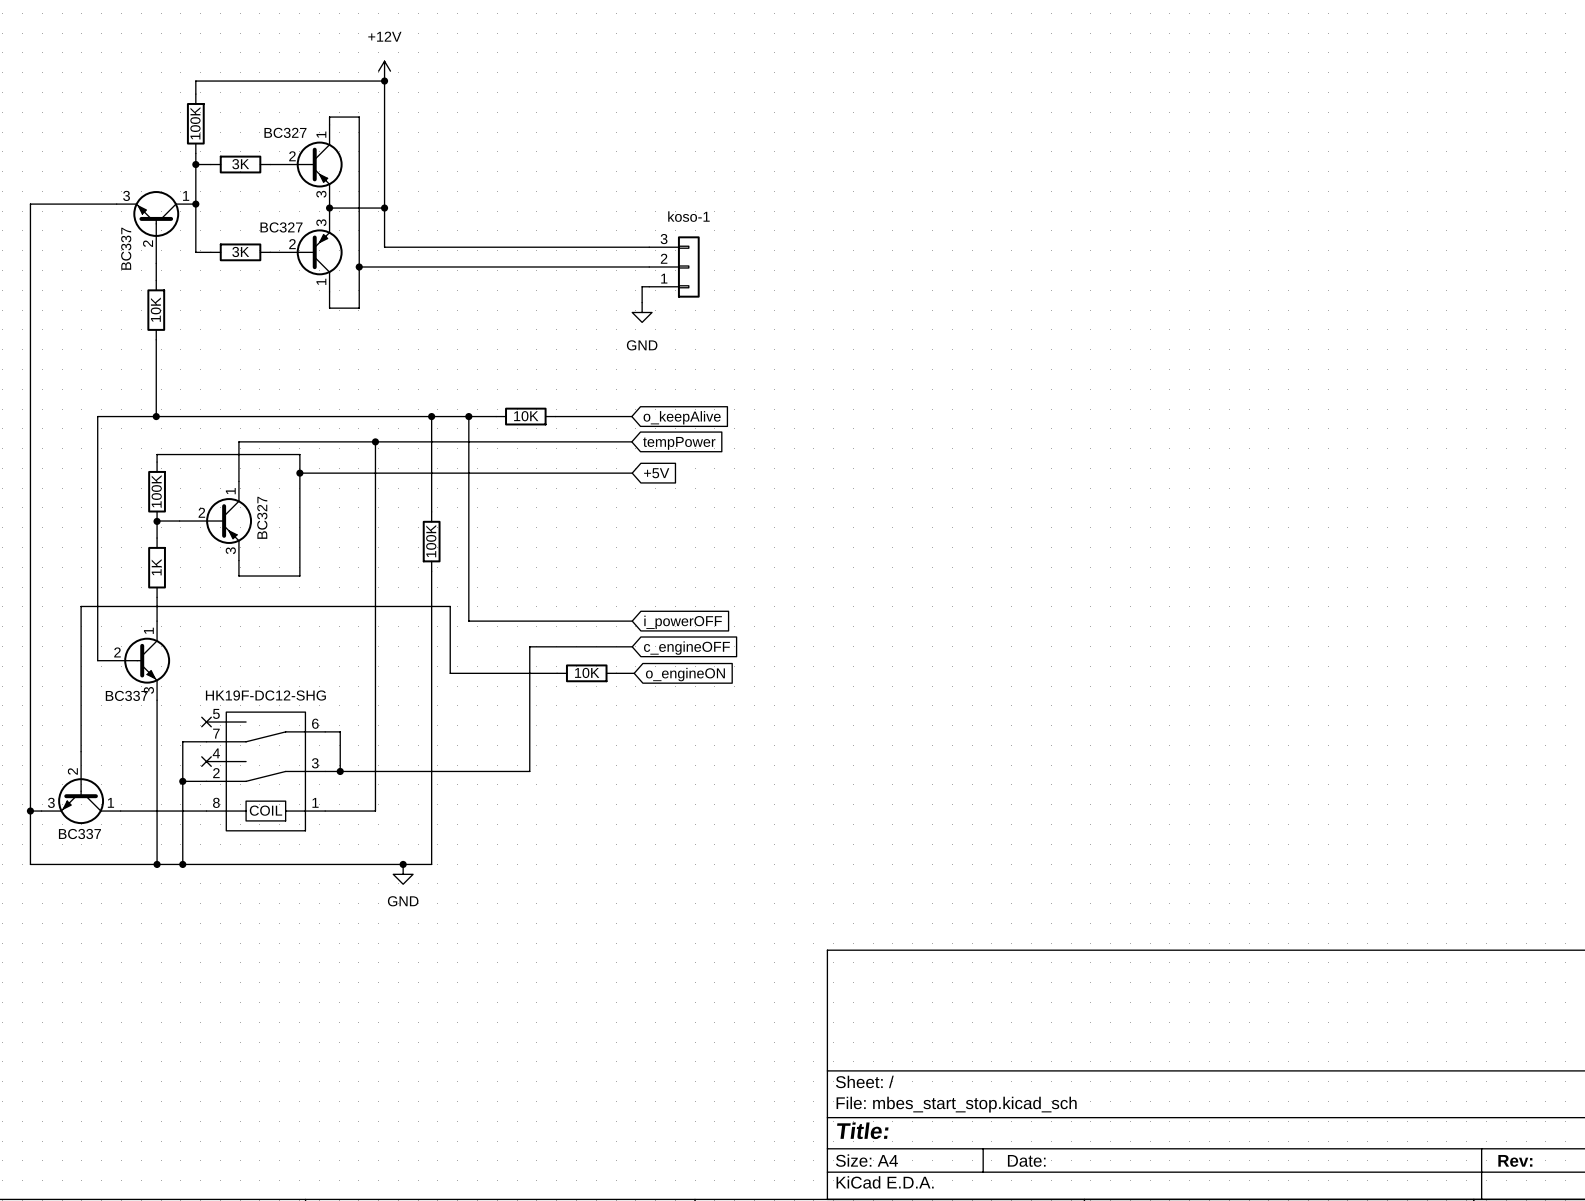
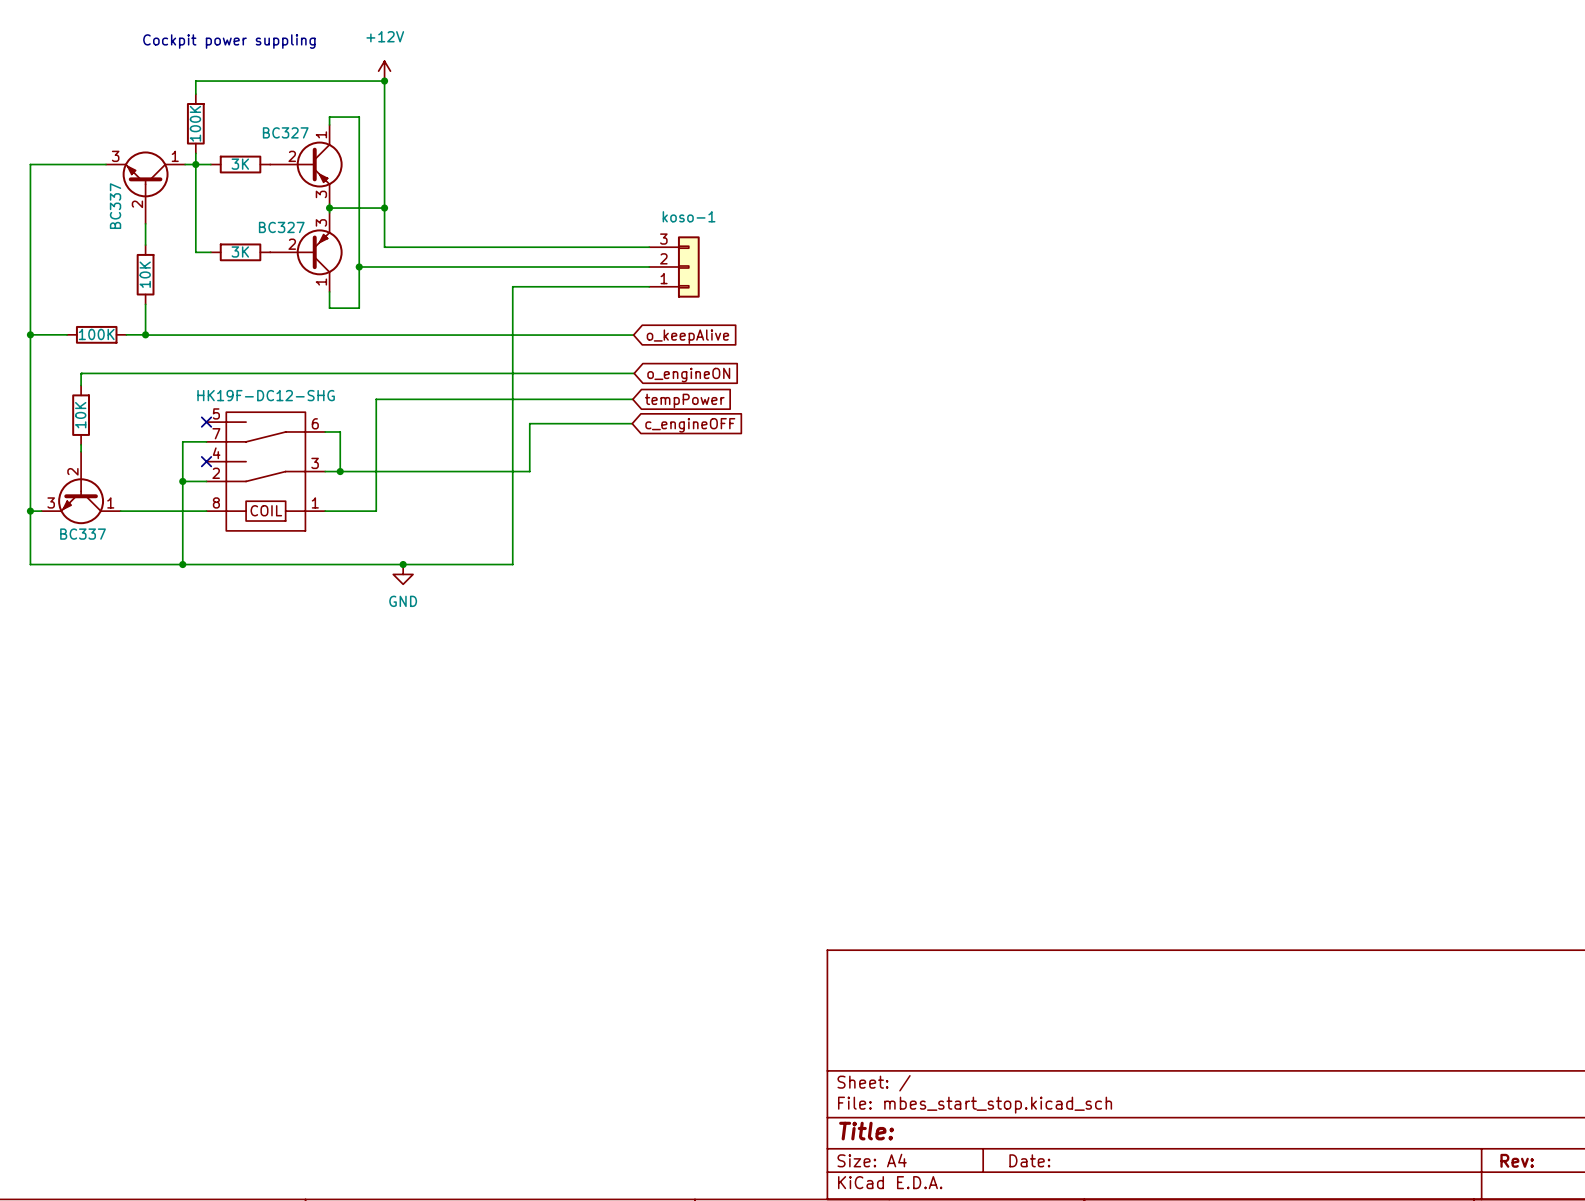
text: none -> Cockpit power suppling (229, 41)
wire: none -> (185, 164) (195, 164)
wire: (30, 204) (116, 204) -> (30, 204) (30, 164) (106, 164)
junction: (195, 204) -> none
wire: none -> (145, 223) (145, 245)
part position: (156, 227) -> (145, 187)
wire: (156, 263) (156, 280) -> none
wire: (642, 286) (642, 302) -> none
wire: none -> (145, 304) (145, 335) (633, 335)
part position: (156, 310) -> (145, 274)
power symbol: GND (642, 312) -> none
wire: none -> (30, 334) (67, 334)
junction: none -> (30, 334)
wire: none -> (126, 334) (145, 334)
junction: none -> (145, 334)
wire: (156, 339) (156, 416) -> none
wire: none -> (634, 373) (81, 373) (81, 385)
global label: none -> o_engineON (688, 375)
wire: none -> (632, 399) (376, 399) (376, 511) (325, 511)
part: none -> 10K (81, 415)
junction: (156, 416) -> none
wire: (431, 416) (431, 511) -> none
junction: (431, 416) -> none
wire: (468, 416) (468, 621) (632, 621) -> none
junction: (468, 416) -> none
wire: (496, 416) (97, 416) (97, 660) -> none
part: 10K (525, 416) -> none
wire: (555, 416) (631, 416) -> none
global label position: o_keepAlive (682, 417) -> o_keepAlive (687, 336)
no-connect mark: none -> (206, 422)
wire: none -> (632, 423) (529, 423) (529, 471) (325, 471)
global label: none -> c_engineOFF (690, 425)
wire: none -> (325, 431) (340, 431) (340, 471)
wire: none -> (206, 441) (182, 441) (182, 564)
wire: (375, 441) (375, 811) (325, 811) -> none
junction: (375, 441) -> none
wire: (632, 441) (238, 441) (238, 481) -> none
global label position: tempPower (679, 443) -> tempPower (684, 400)
wire: none -> (81, 444) (81, 451)
no-connect mark: none -> (206, 461)
wire: (157, 462) (157, 454) (299, 454) (299, 576) (238, 576) (238, 560) -> none
part: none -> HK19F-DC12-SHG (265, 471)
junction: none -> (340, 471)
wire: (299, 473) (632, 473) -> none
junction: (299, 473) -> none
global label: +5V (656, 473) -> none
wire: none -> (182, 481) (206, 481)
junction: none -> (182, 481)
part: none -> BC337 (81, 487)
part rotation: 0° (157, 491) -> 90° clockwise (96, 334)
part position: (157, 491) -> (96, 334)
wire: none -> (30, 511) (41, 511)
junction: none -> (30, 511)
wire: none -> (120, 511) (206, 511)
junction: (157, 521) -> none
wire: (179, 521) (157, 521) (157, 538) -> none
part: BC327 (215, 521) -> none
part: 100K (431, 541) -> none
wire: (30, 564) (30, 864) (431, 864) (431, 571) -> (30, 564) (512, 564) (512, 286) (642, 286)
junction: none -> (182, 564)
junction: none -> (403, 564)
part: 1K (157, 567) -> none
power symbol: none -> GND (403, 574)
wire: (157, 597) (157, 621) -> none
global label: i_powerOFF (683, 622) -> none
wire: (632, 646) (529, 646) (529, 771) (325, 771) -> none
global label: c_engineOFF (686, 648) -> none
part: BC337 (133, 660) -> none
wire: (557, 673) (450, 673) (450, 606) (81, 606) (81, 751) -> none
part: 10K (586, 673) -> none
wire: (616, 673) (634, 673) -> none
global label: o_engineON (685, 674) -> none
wire: (157, 700) (157, 864) -> none
no-connect mark: (206, 722) -> none
wire: (325, 731) (340, 731) (340, 771) -> none
wire: (206, 741) (182, 741) (182, 864) -> none
no-connect mark: (206, 761) -> none
part: HK19F-DC12-SHG (265, 771) -> none
junction: (340, 771) -> none
wire: (182, 781) (206, 781) -> none
junction: (182, 781) -> none
part: BC337 (81, 787) -> none
wire: (30, 811) (41, 811) -> none
junction: (30, 811) -> none
wire: (120, 811) (206, 811) -> none
junction: (157, 864) -> none
junction: (182, 864) -> none
junction: (403, 864) -> none
power symbol: GND (403, 874) -> none

